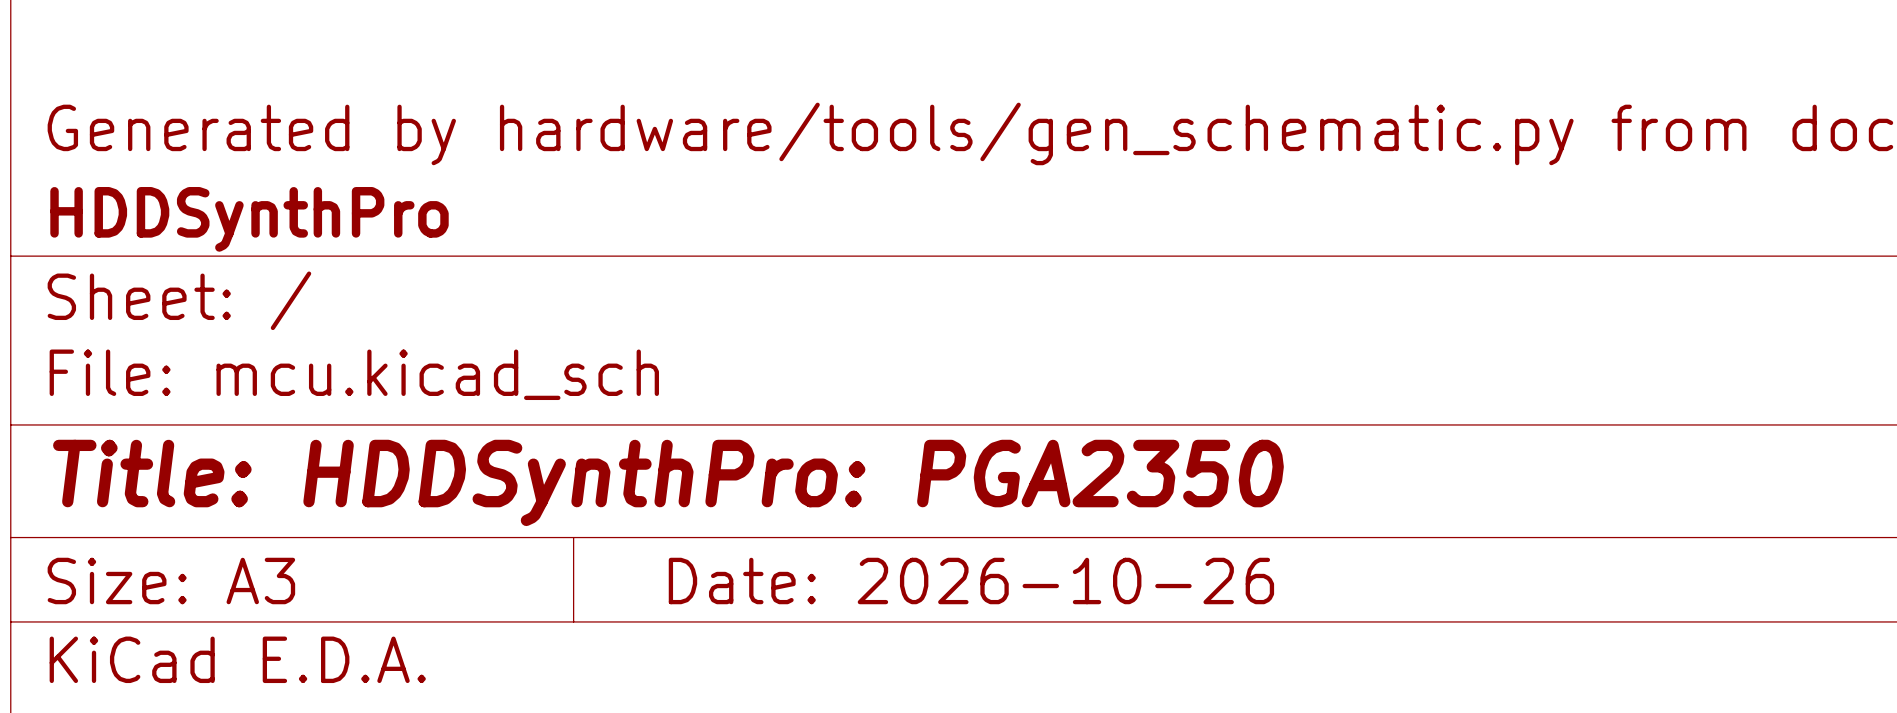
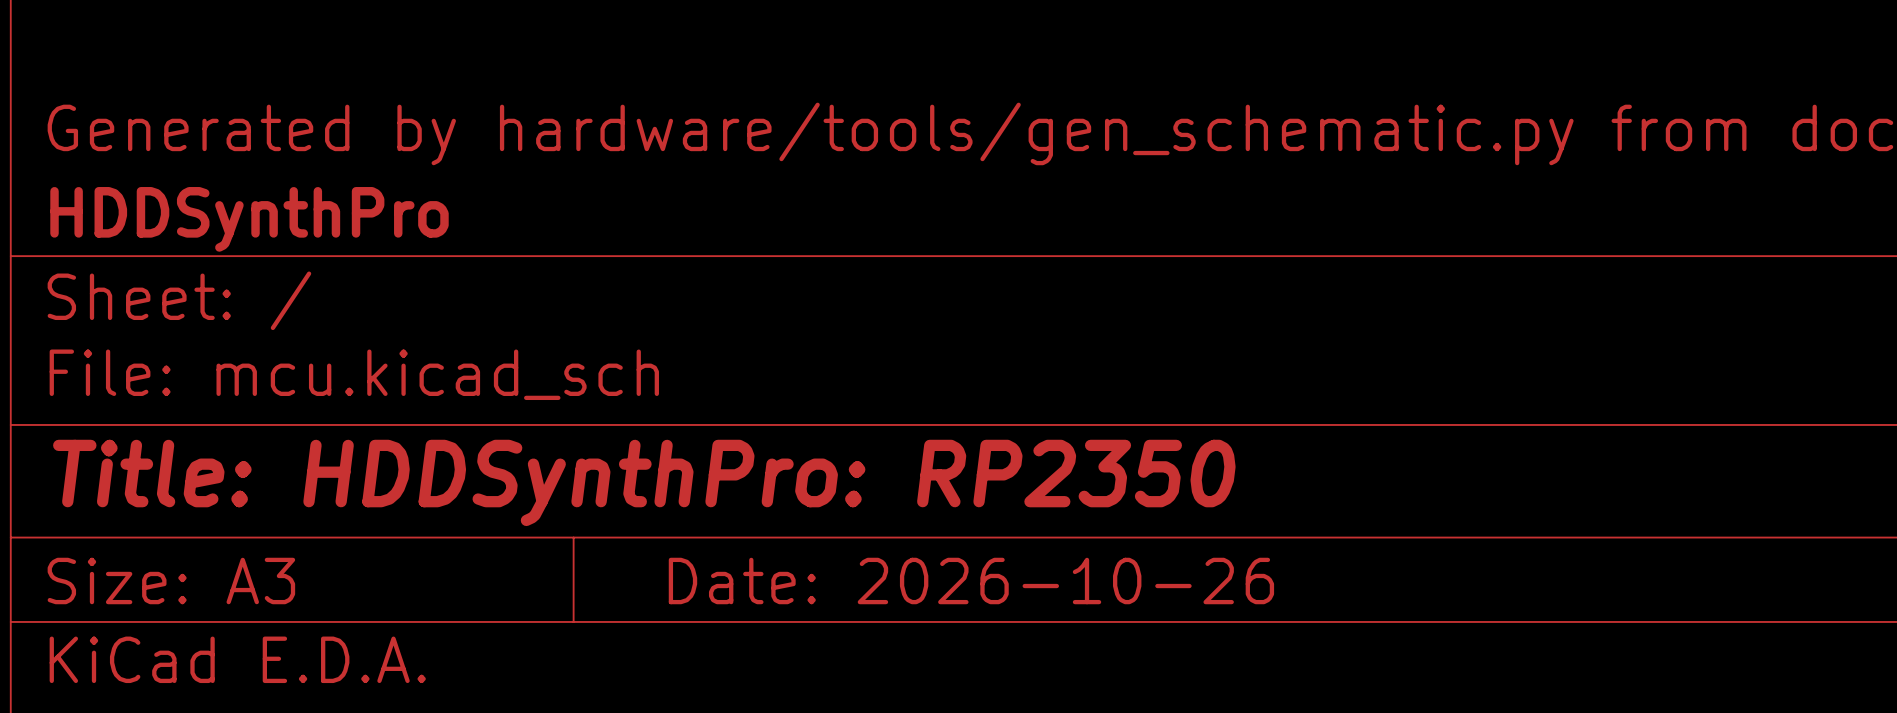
title block: Title: HDDSynthPro: PGA2350 (668, 482) -> Title: HDDSynthPro: RP2350 (644, 482)

